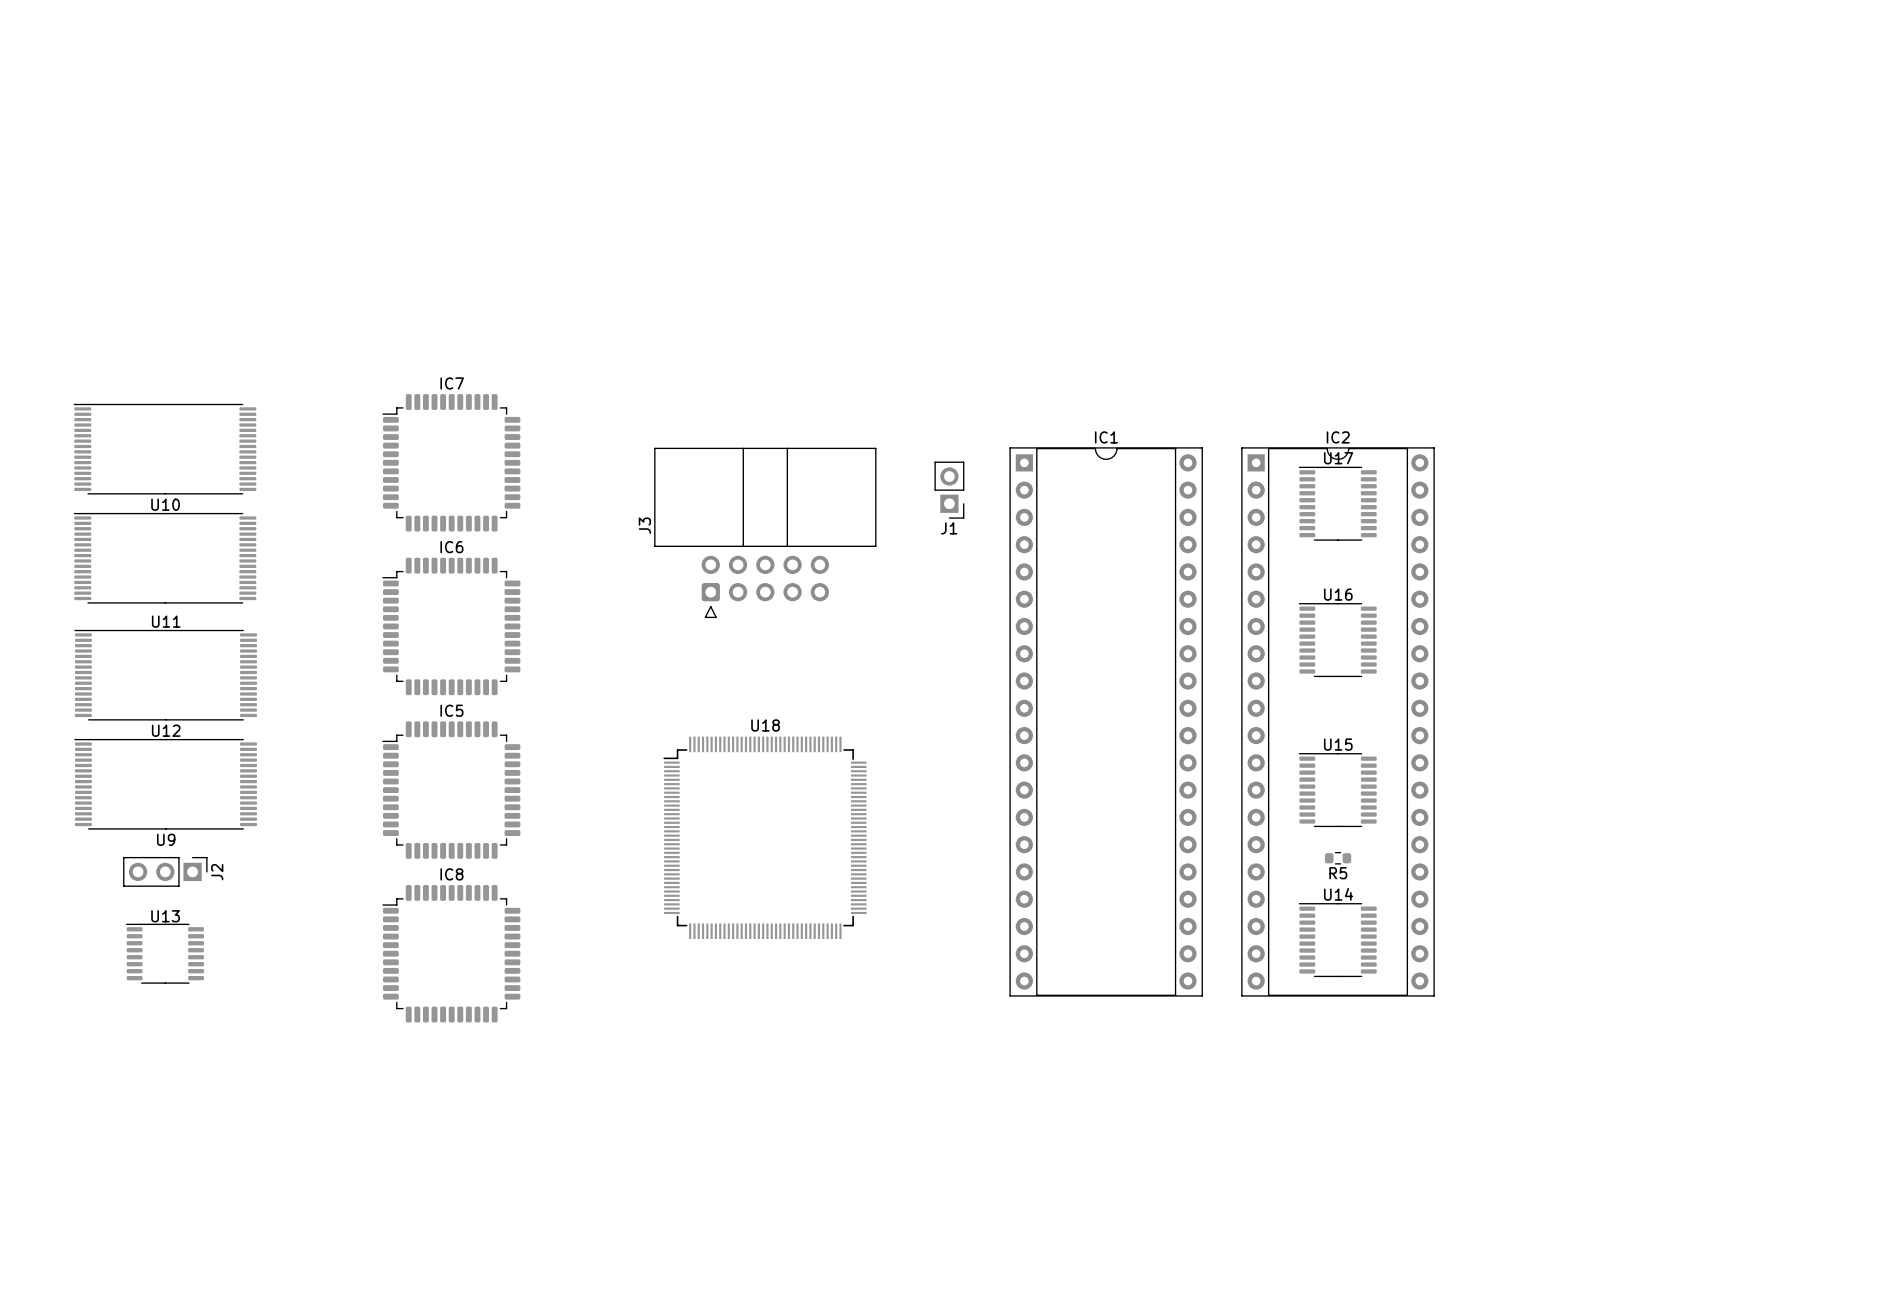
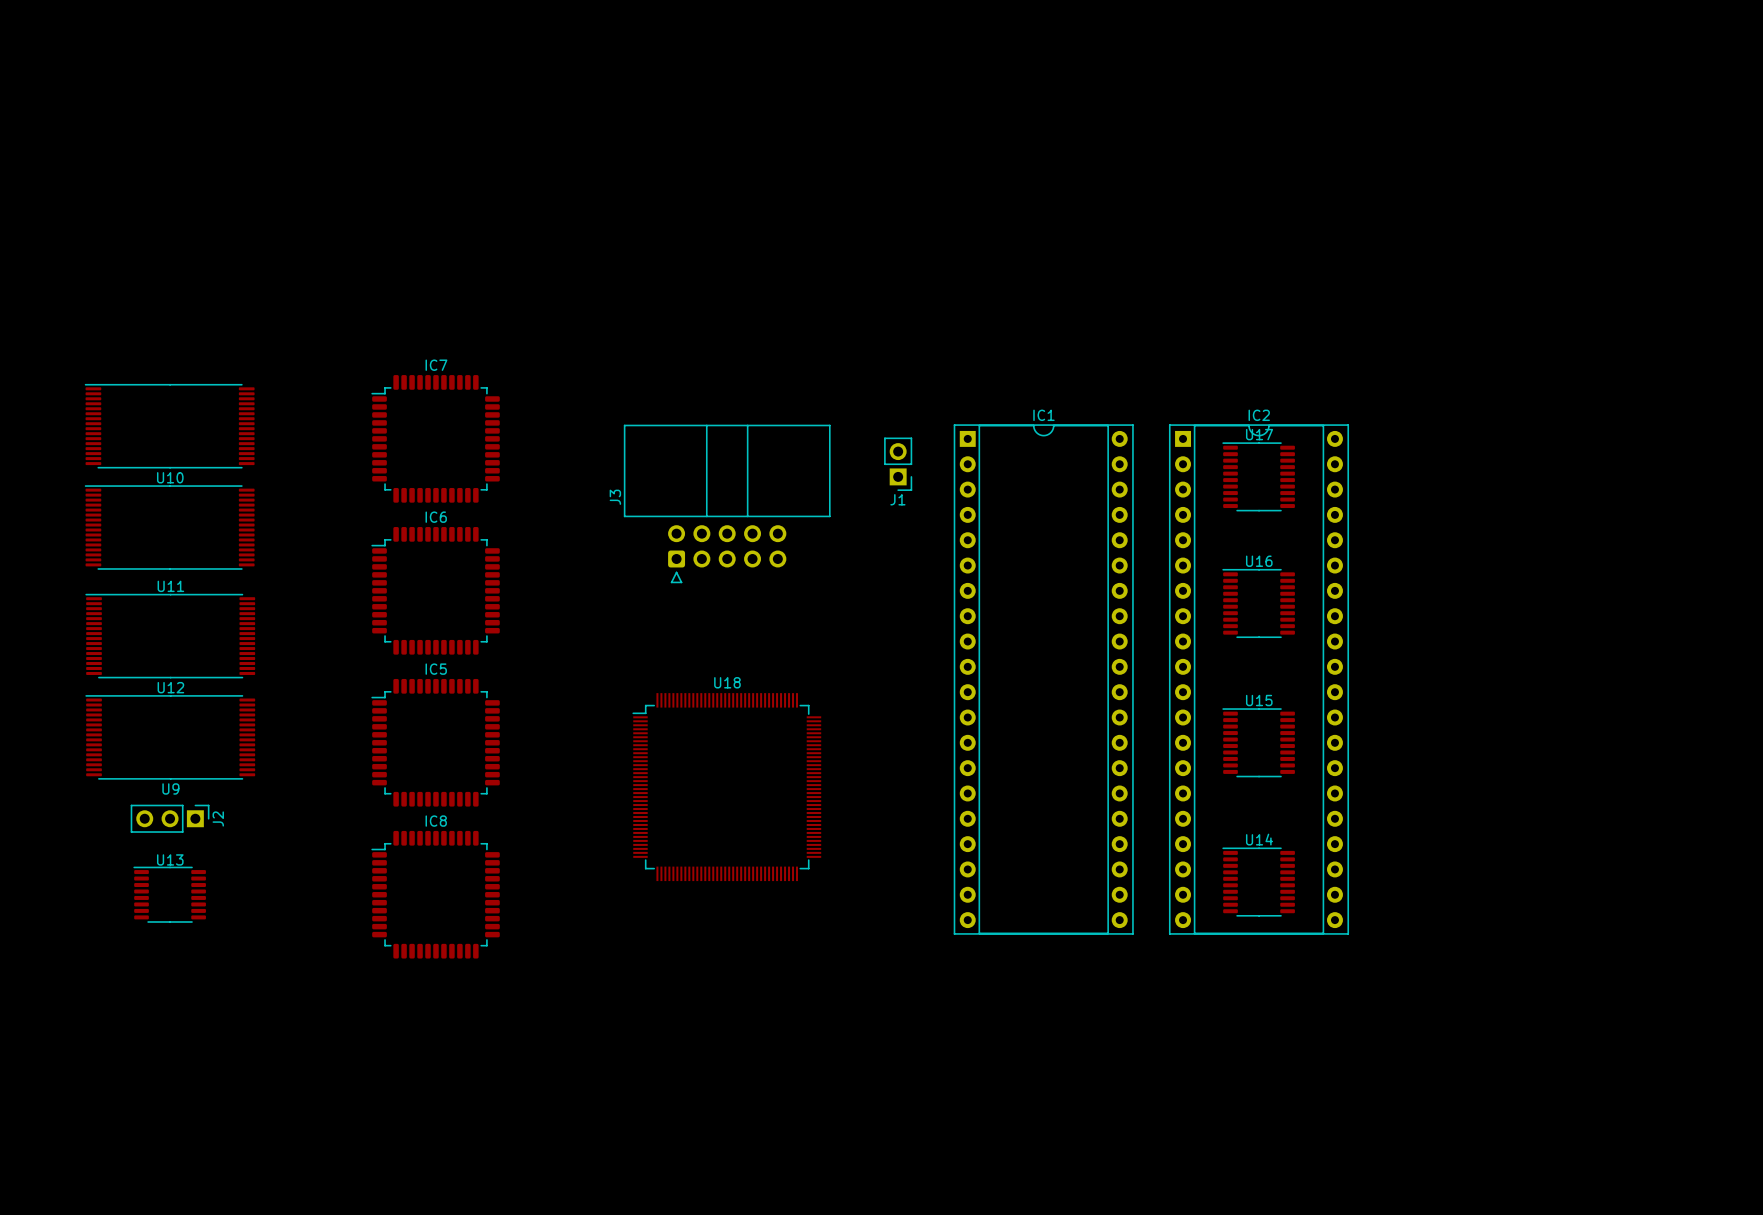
R5: (1338, 858) -> none

